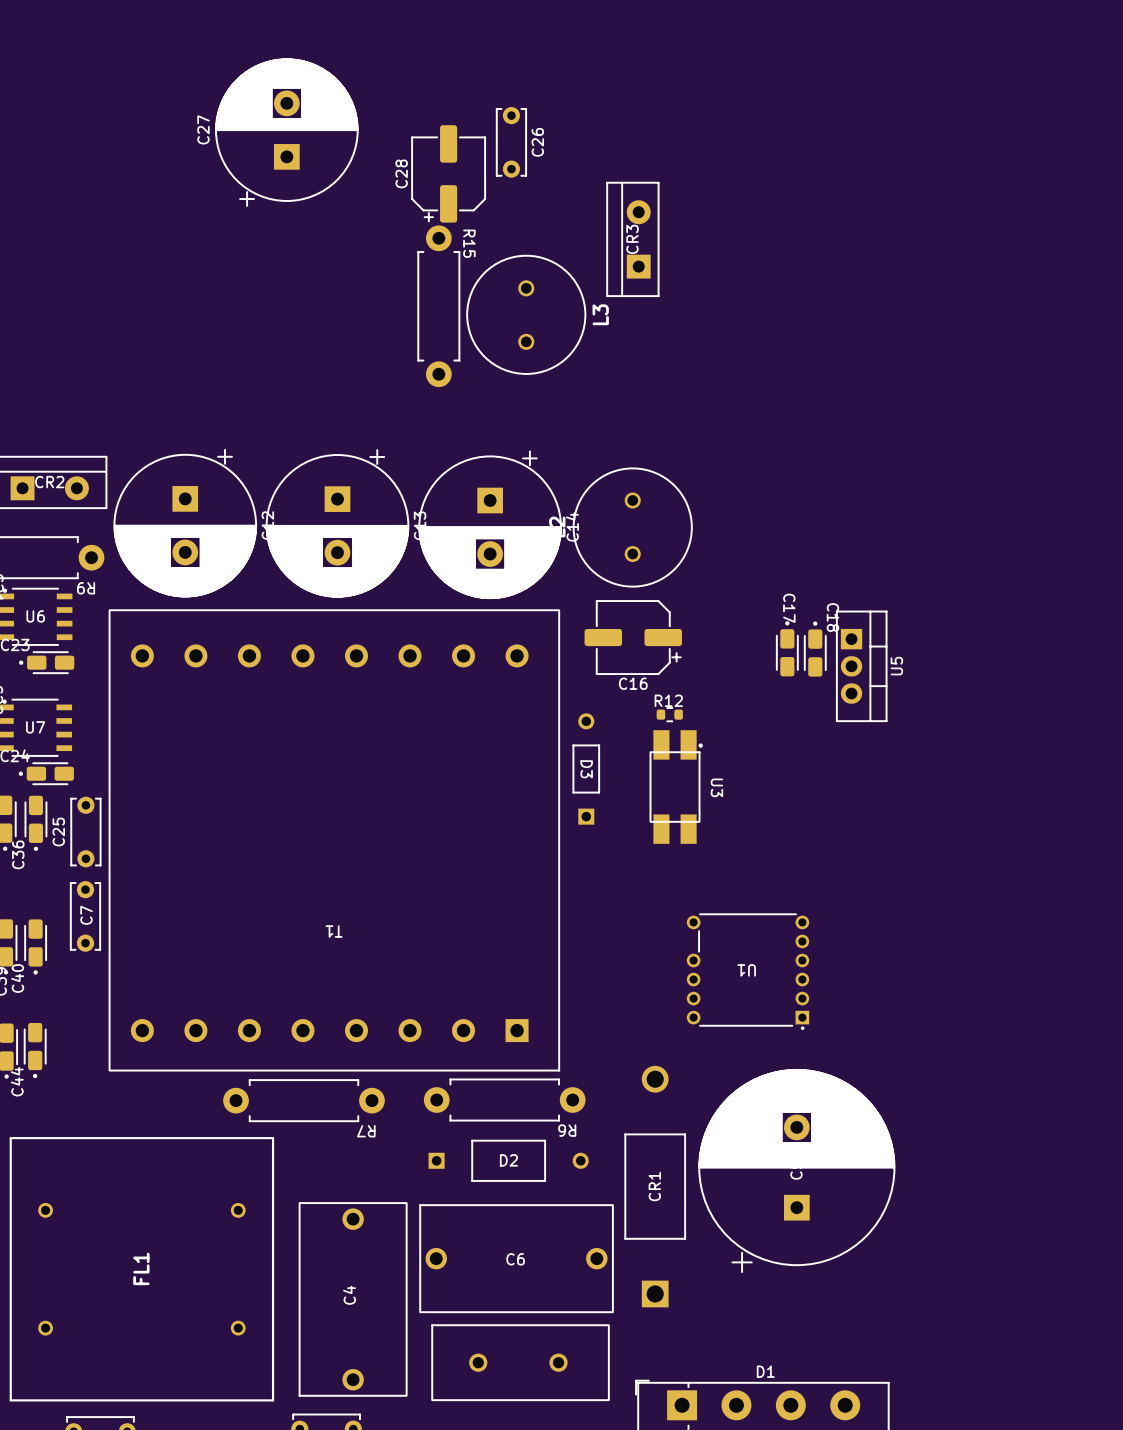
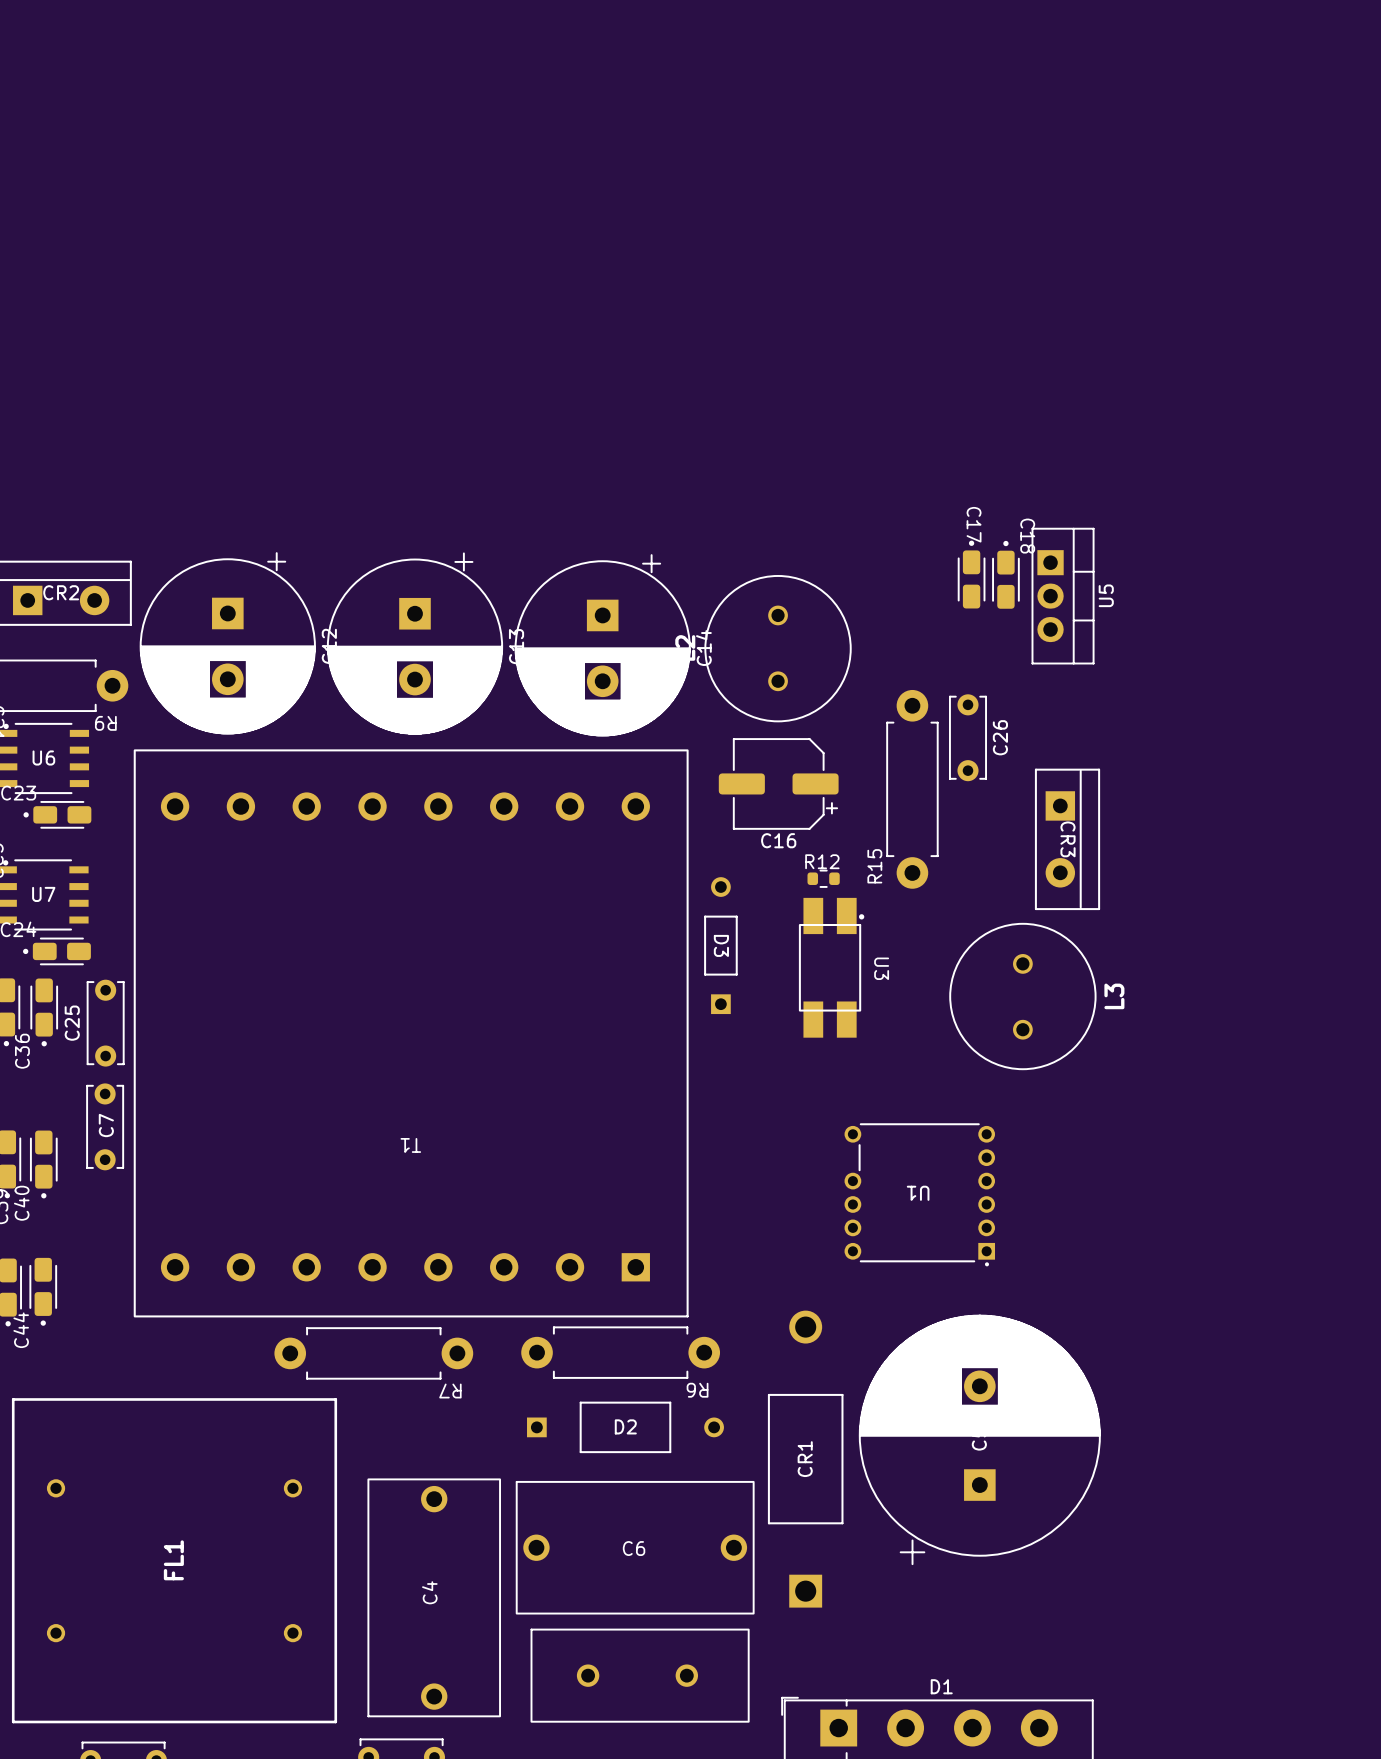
C27: (286, 132) -> none
C26 position: (511, 142) -> (967, 737)
C28: (448, 173) -> none
CR3 rotation: 0° (632, 239) -> 180° (1067, 839)
CR3 position: (632, 239) -> (1067, 839)
R15 name rotation: 0° (469, 243) -> 180° (874, 866)
R15 name position: R15 (469, 243) -> R15 (874, 866)
R15 position: (438, 306) -> (912, 789)
L3 position: (526, 314) -> (1022, 996)
C17 position: (787, 648) -> (971, 574)
C18 position: (815, 649) -> (1005, 574)
U5 position: (861, 666) -> (1063, 596)

